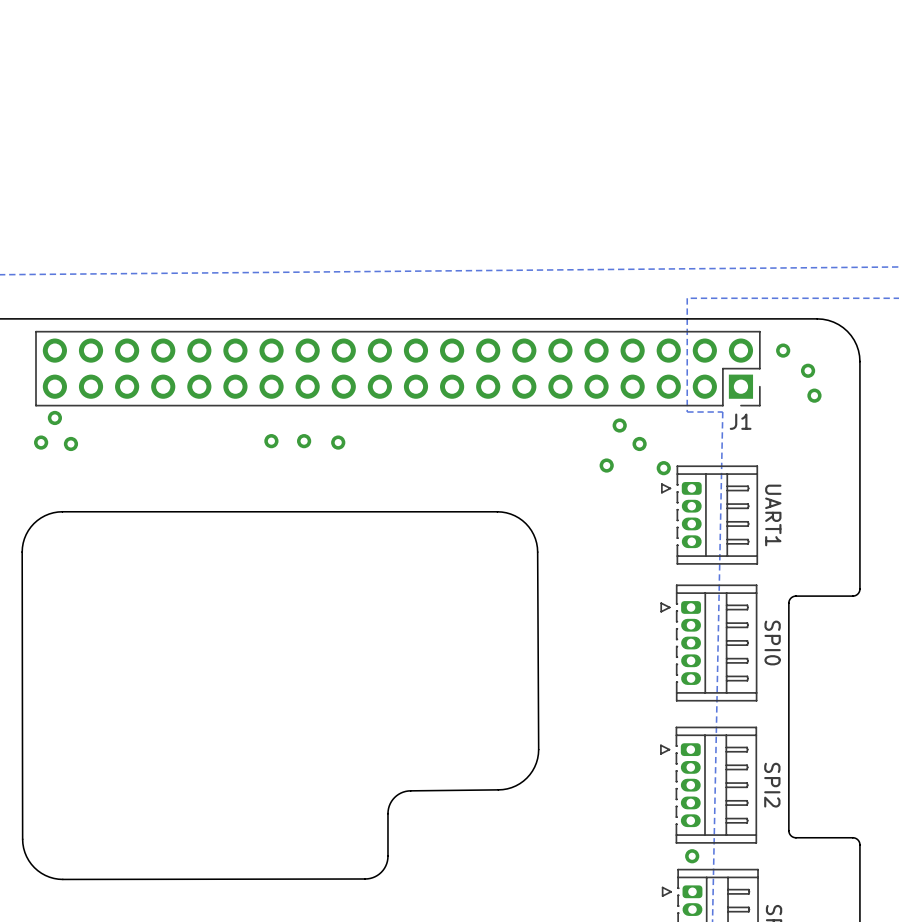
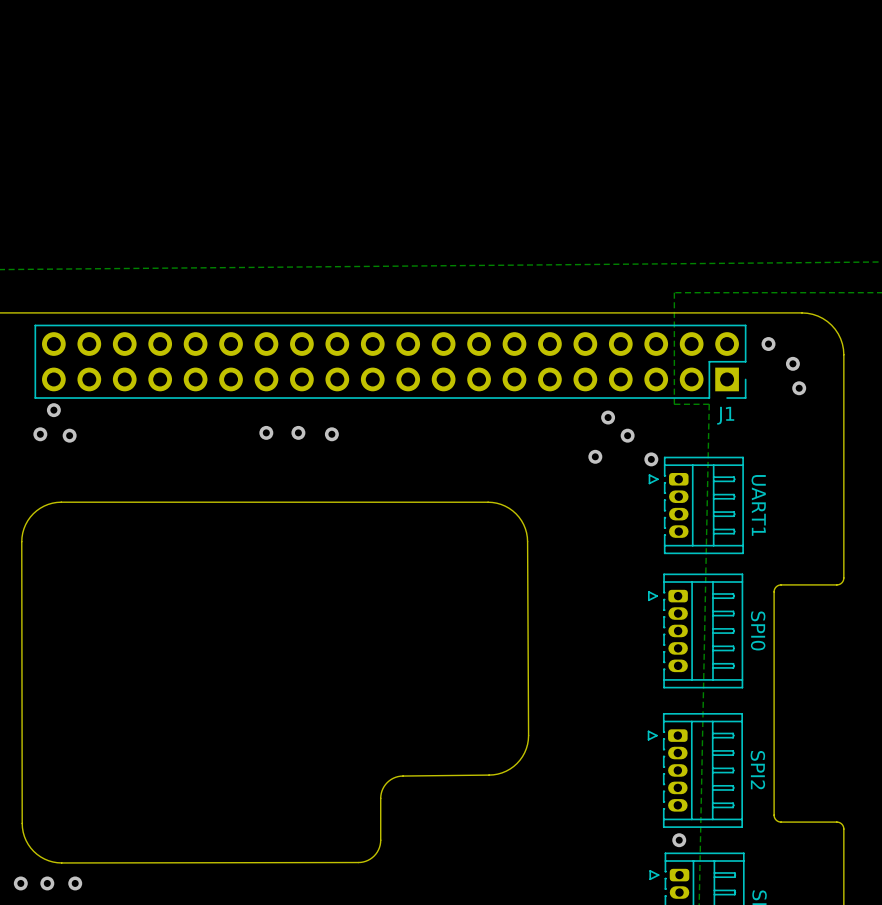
via: none -> (20, 883)
via: none -> (47, 883)
via: none -> (75, 883)

